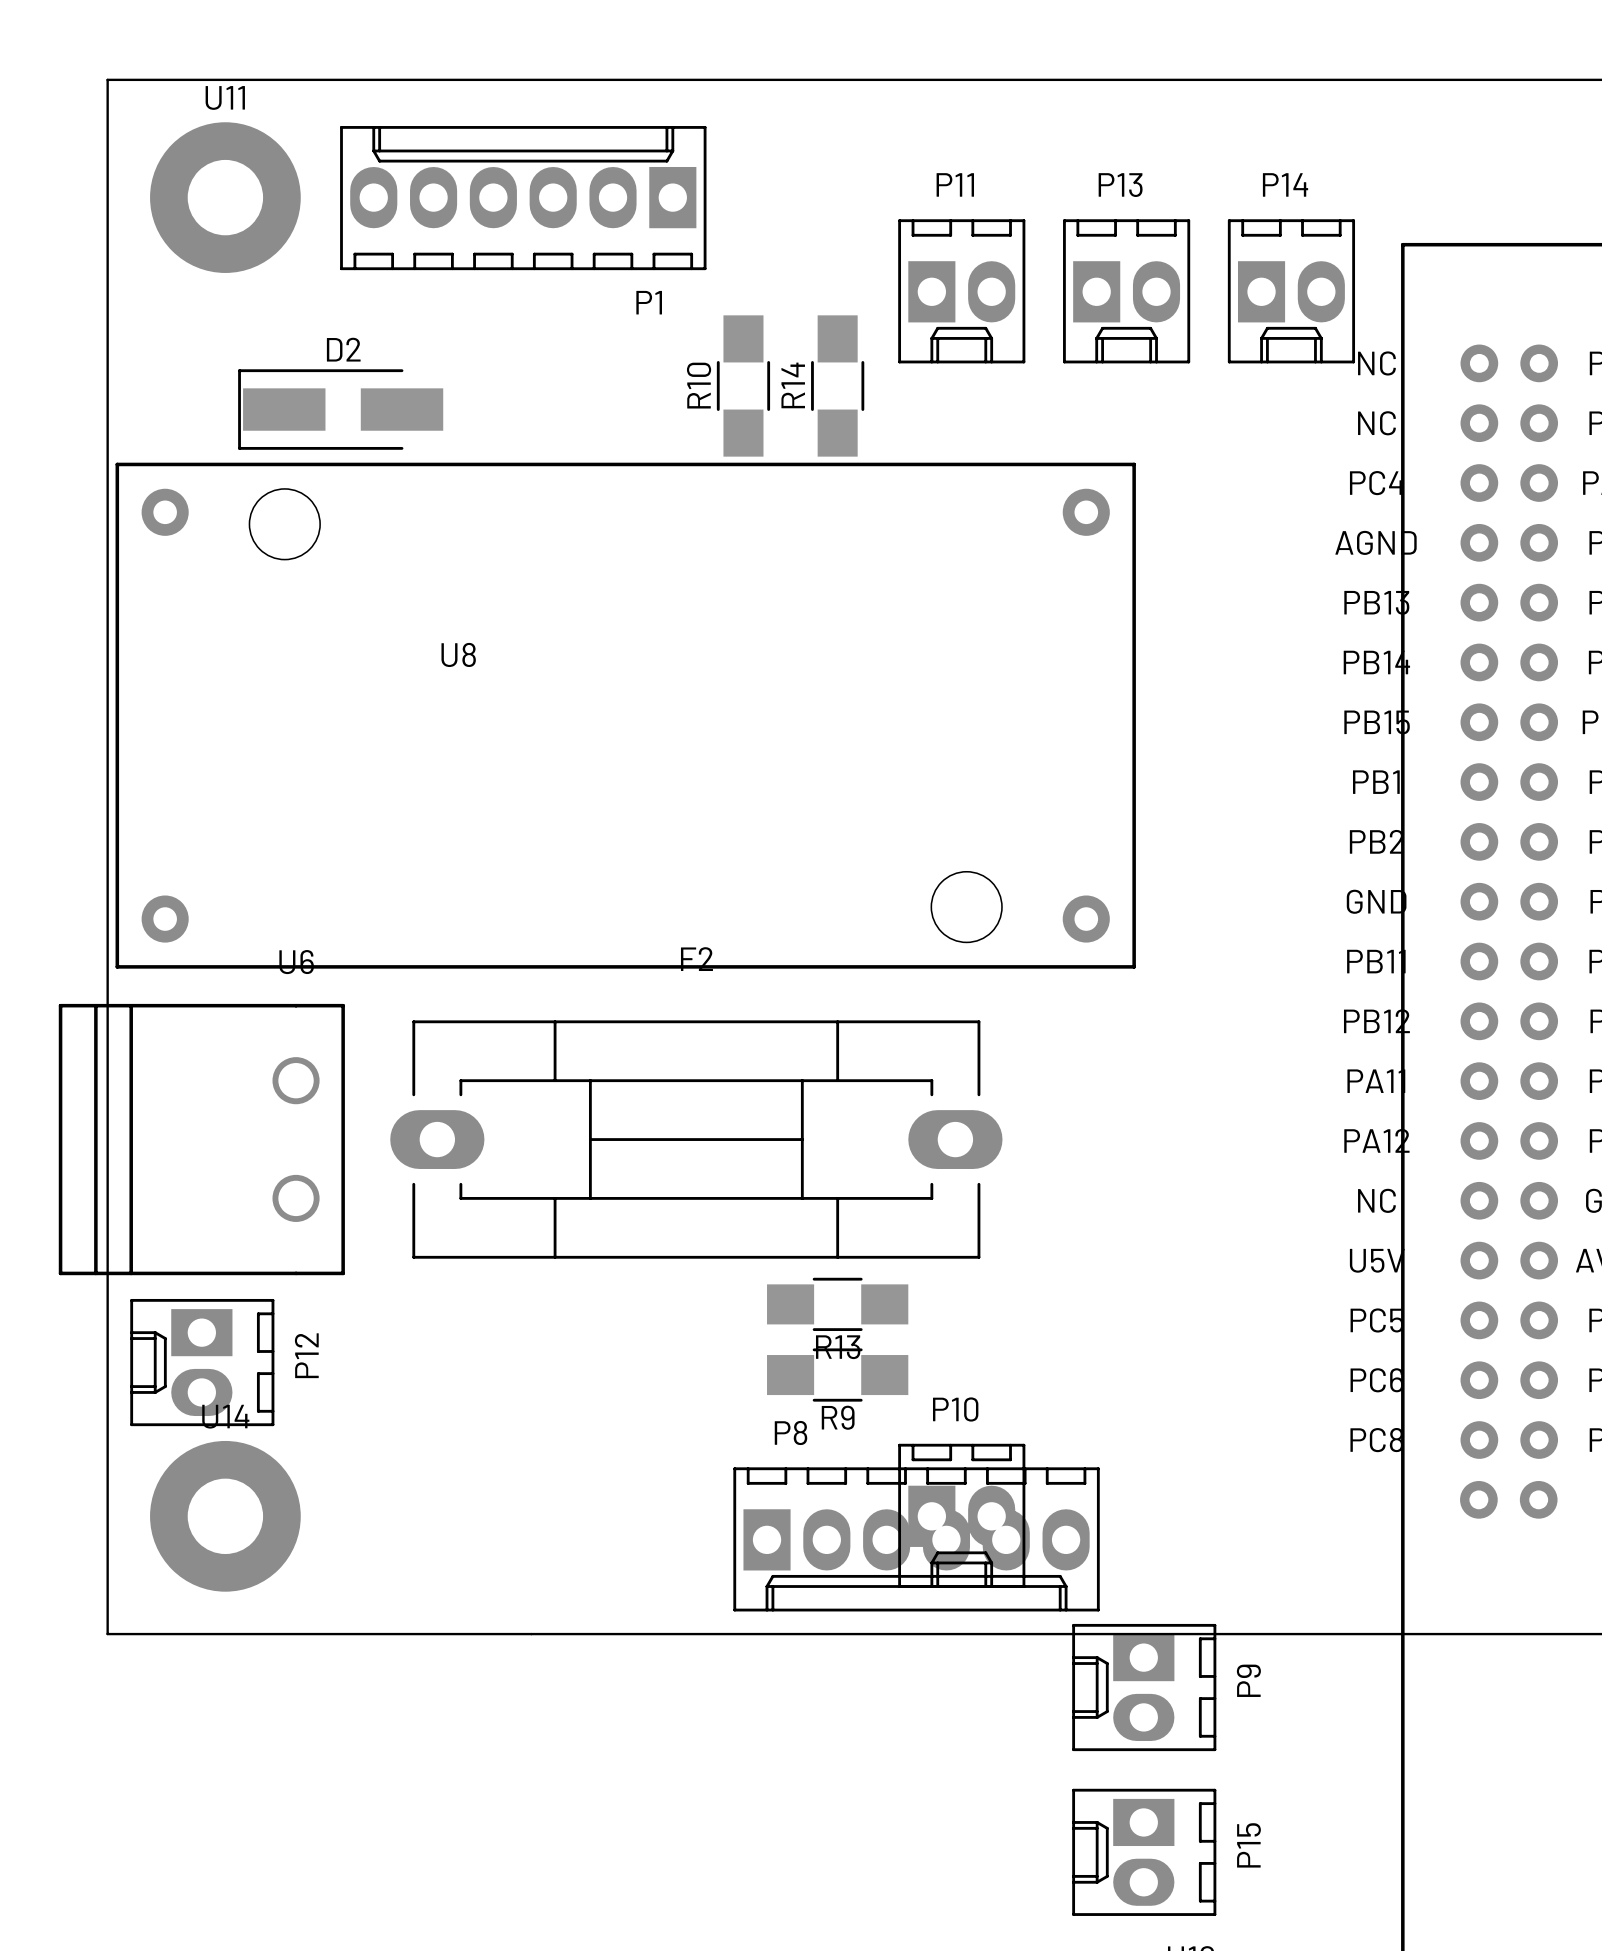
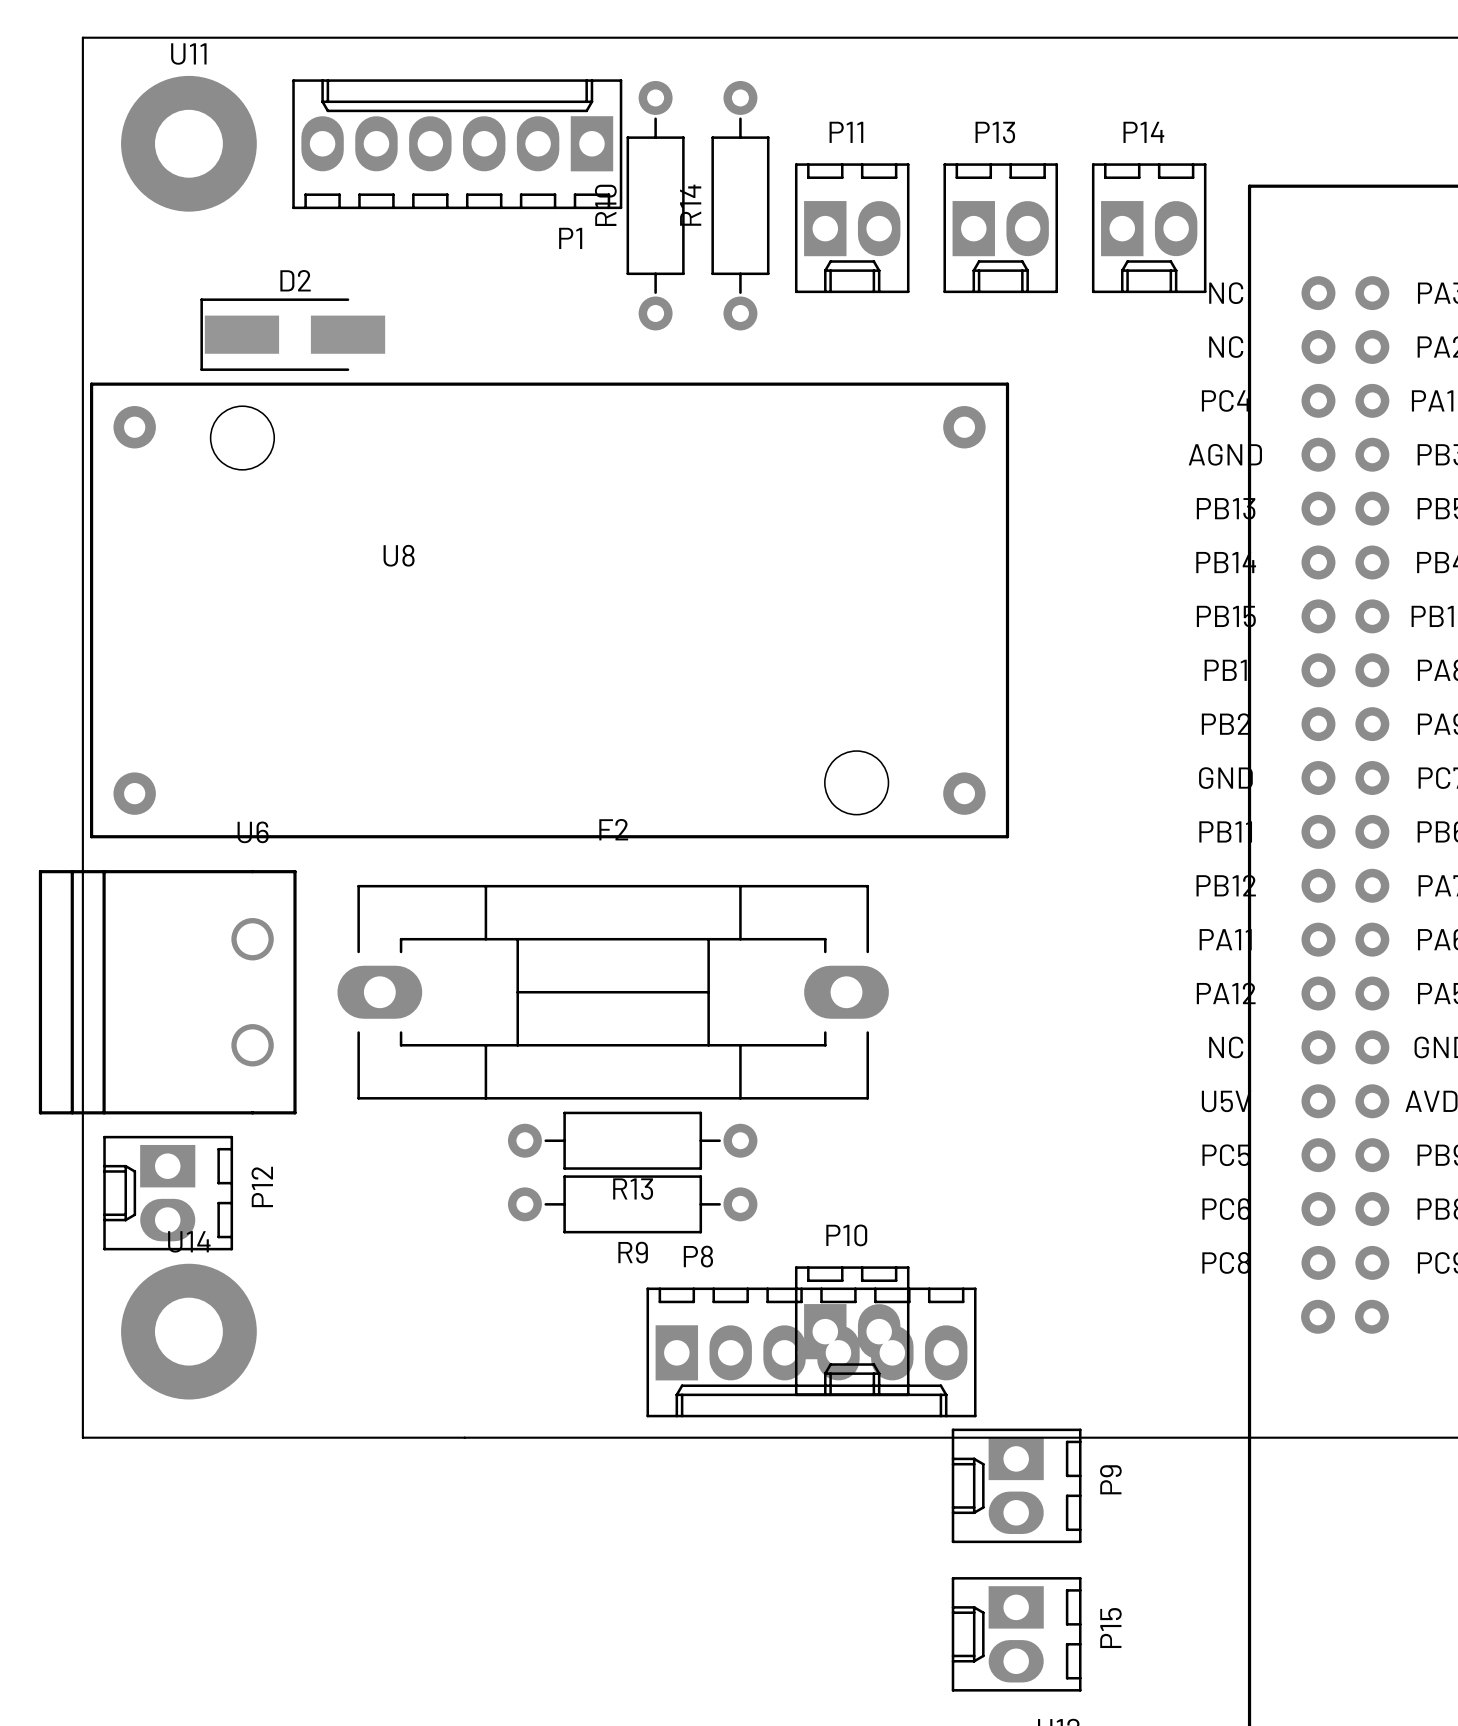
R10 footprint: [716, 315, 771, 457] -> [626, 80, 685, 331]
R14 footprint: [811, 315, 865, 457] -> [711, 80, 770, 331]
R13 footprint: [767, 1277, 909, 1332] -> [507, 1111, 758, 1170]
R9 footprint: [767, 1348, 909, 1402] -> [507, 1175, 758, 1234]

